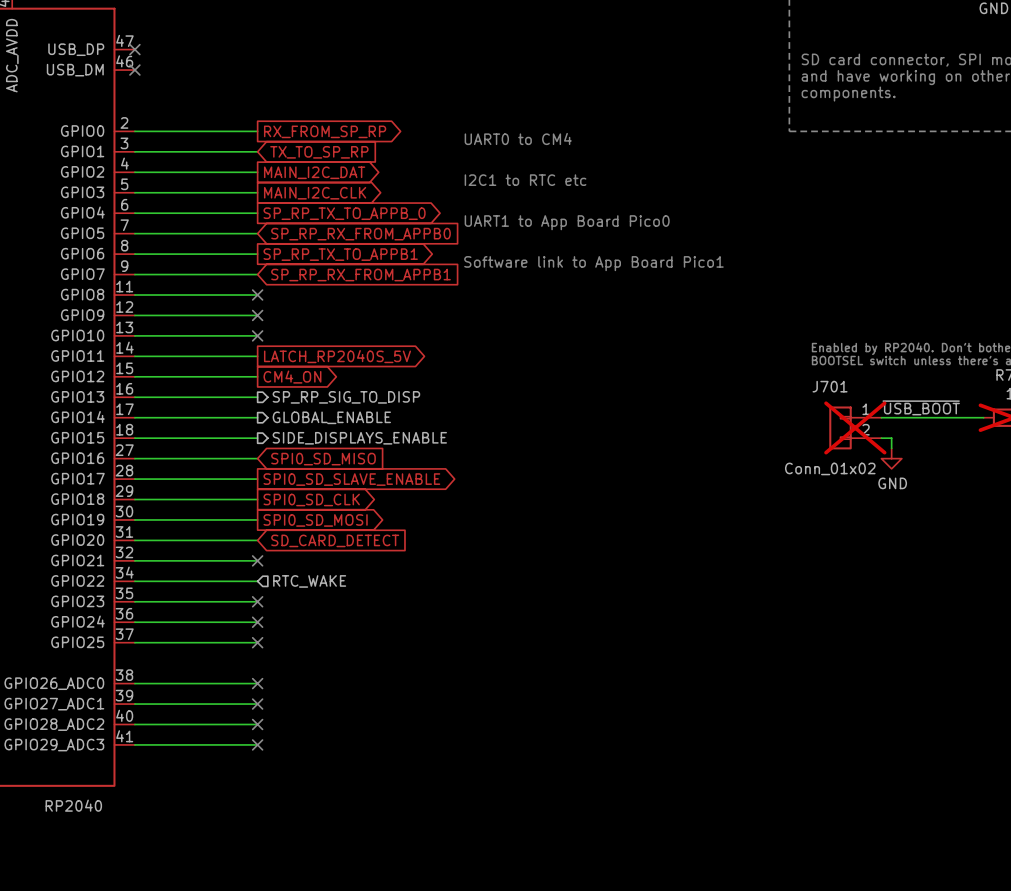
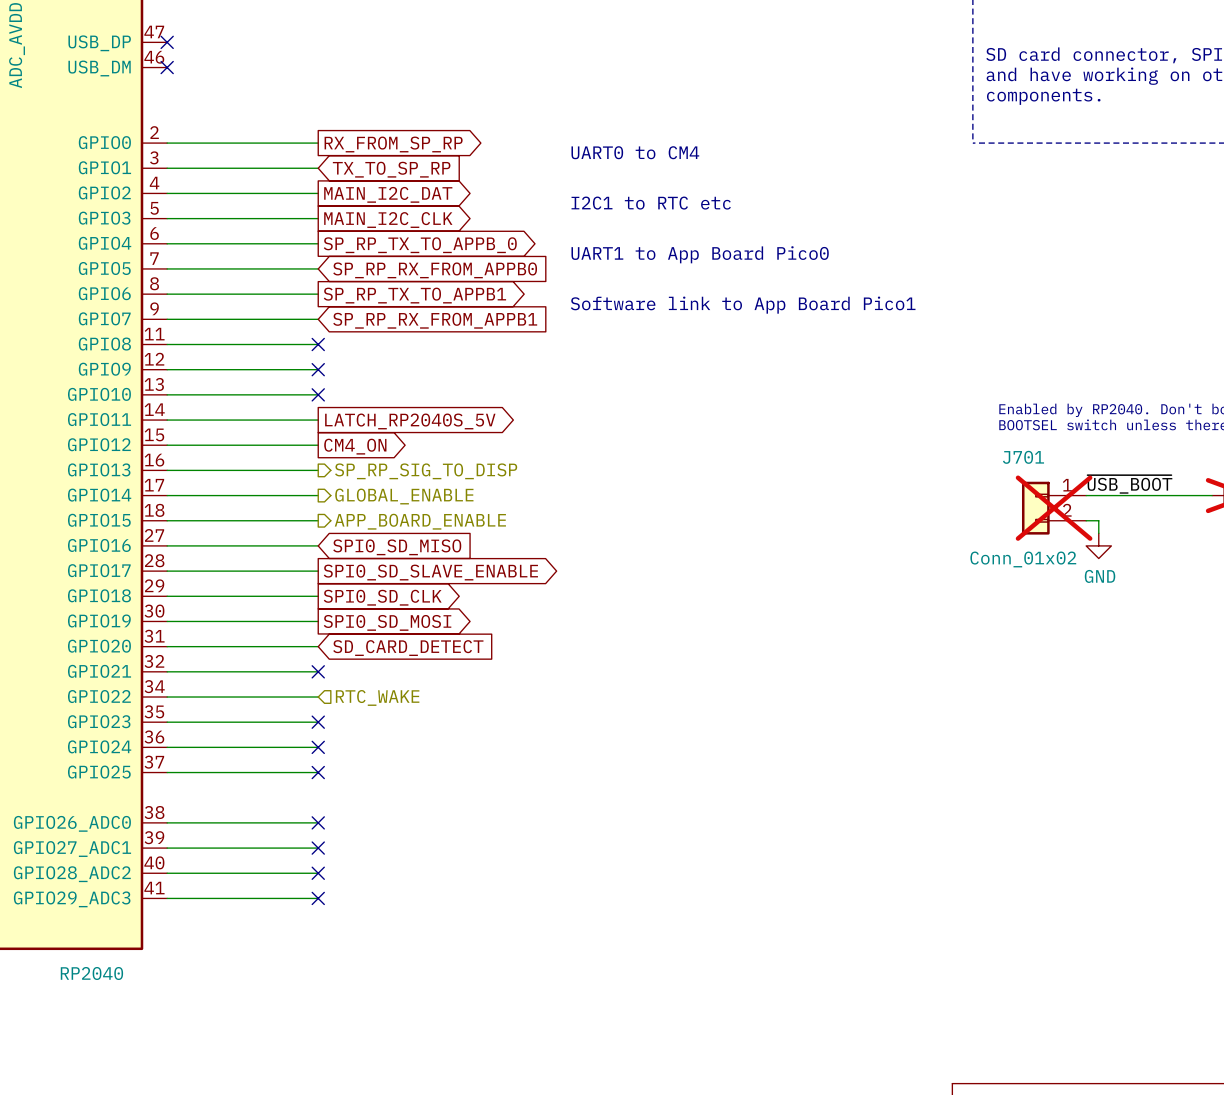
hierarchical label: SIDE_DISPLAYS_ENABLE (359, 438) -> APP_BOARD_ENABLE (420, 521)

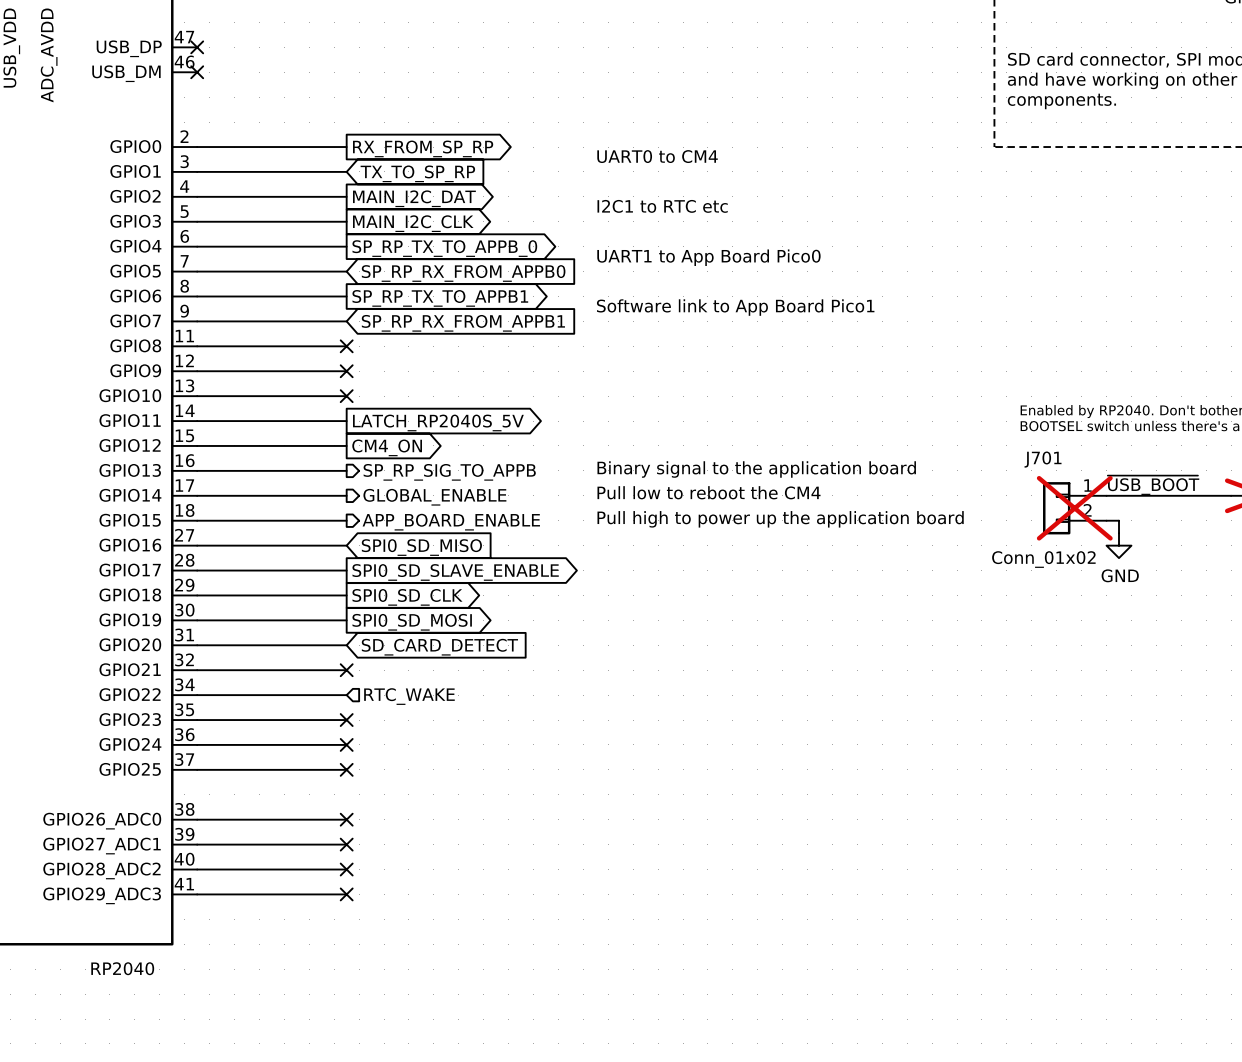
text: none -> Binary signal to the application board (756, 469)
hierarchical label: SP_RP_SIG_TO_DISP (426, 471) -> SP_RP_SIG_TO_APPB (449, 472)
text: none -> Pull low to reboot the CM4 (709, 492)
text: none -> Pull high to power up the application board (780, 519)

